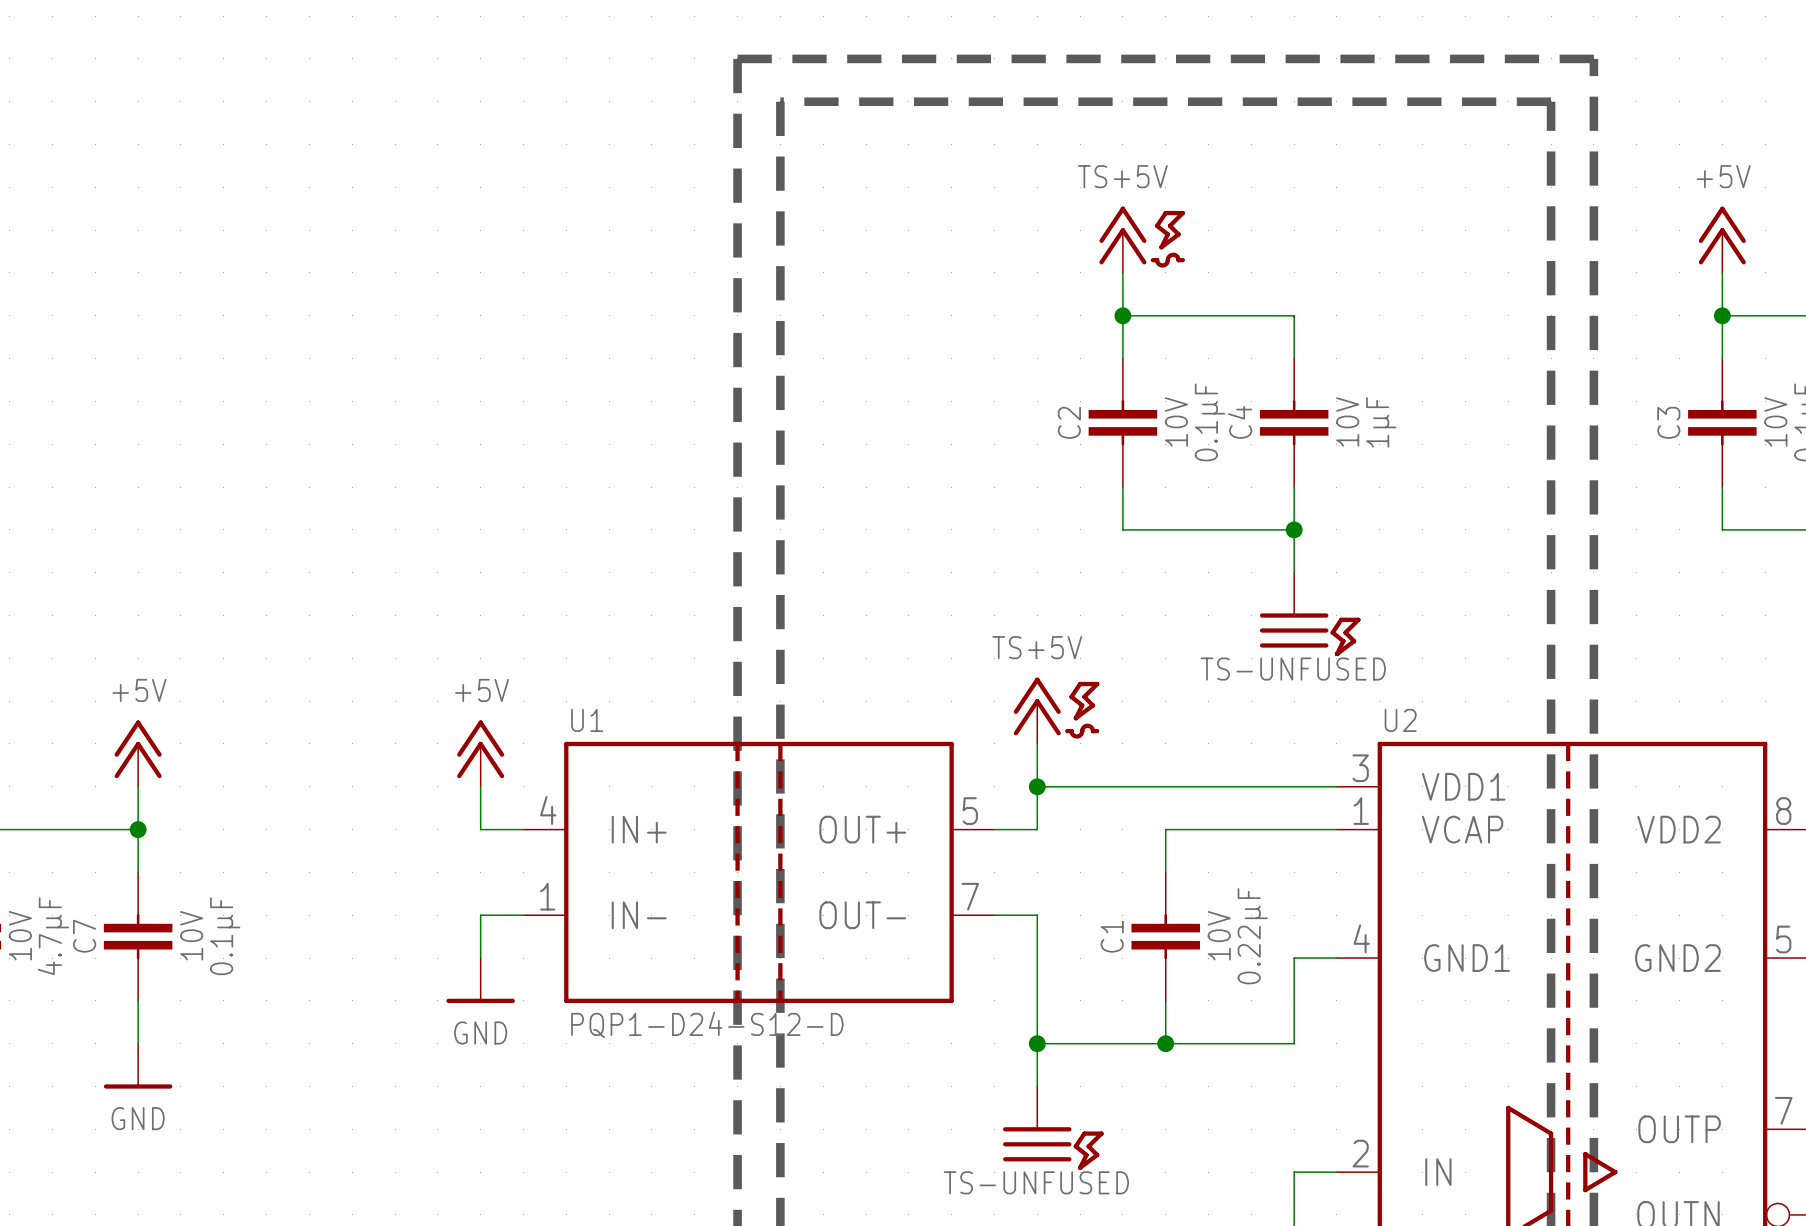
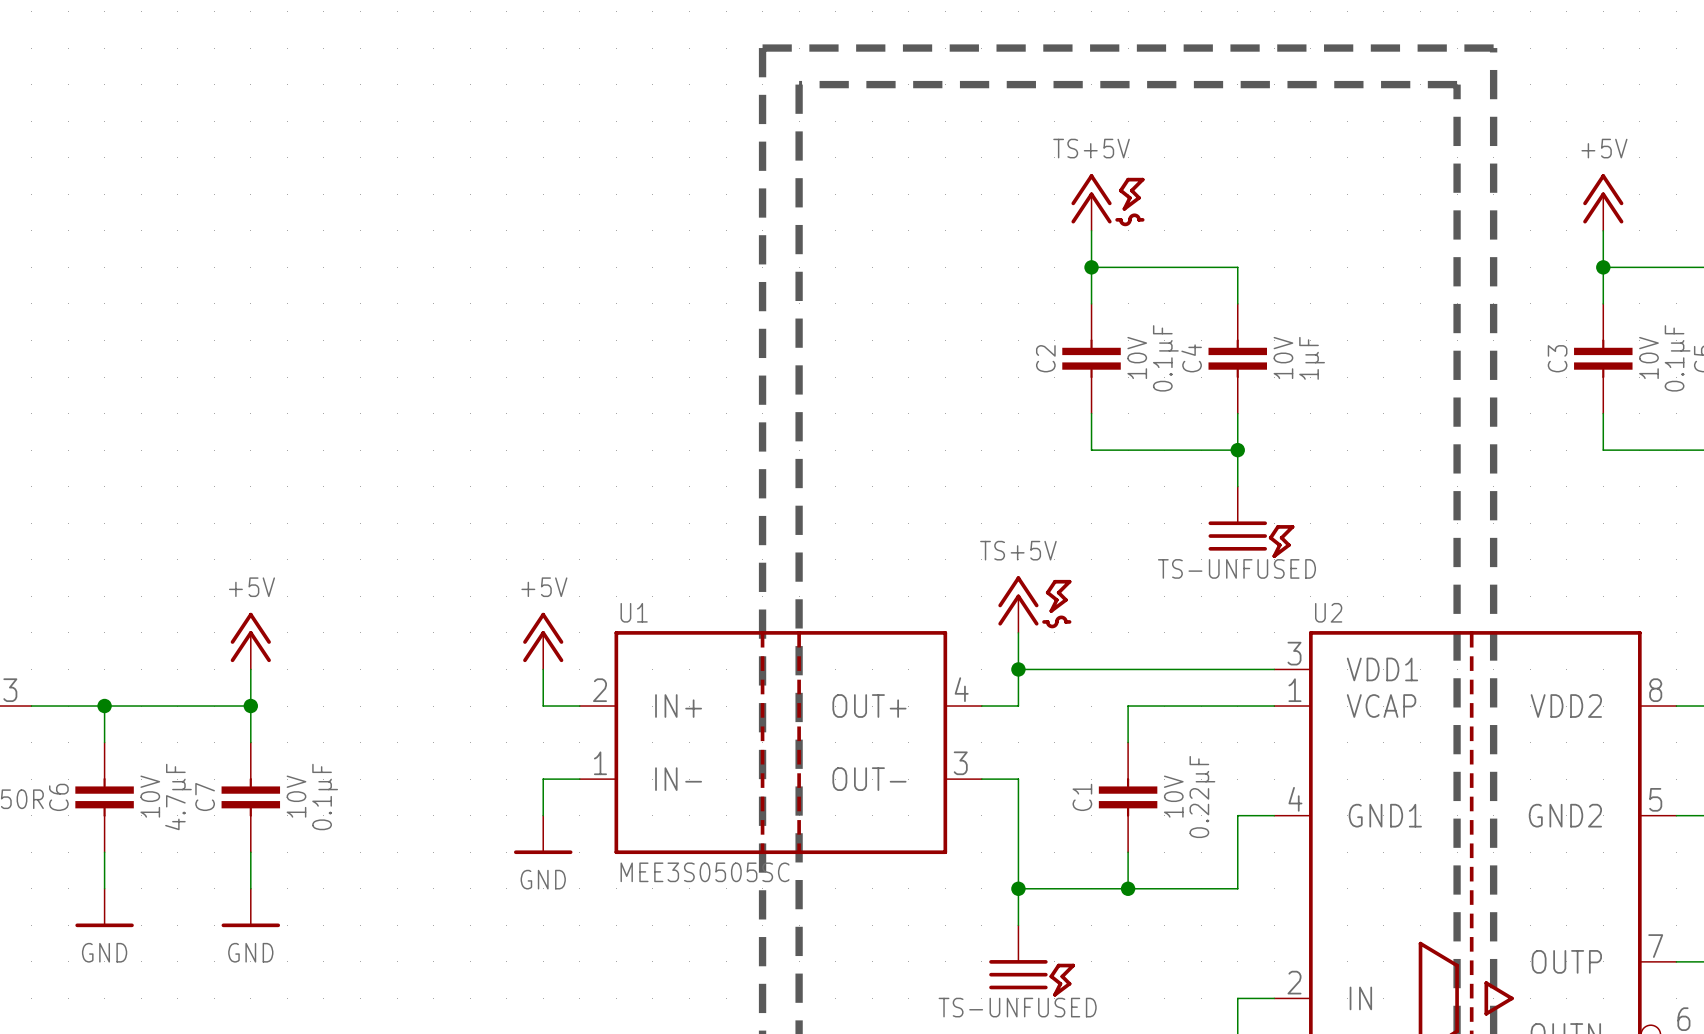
U1 pin number: 4 (548, 810) -> 2 (599, 690)
U1 pin number: 5 (970, 811) -> 4 (961, 689)
U1 pin number: 7 (970, 896) -> 3 (960, 763)
U1 text: PQP1-D24-S12-D (707, 1024) -> MEE3S0505SC (705, 872)

